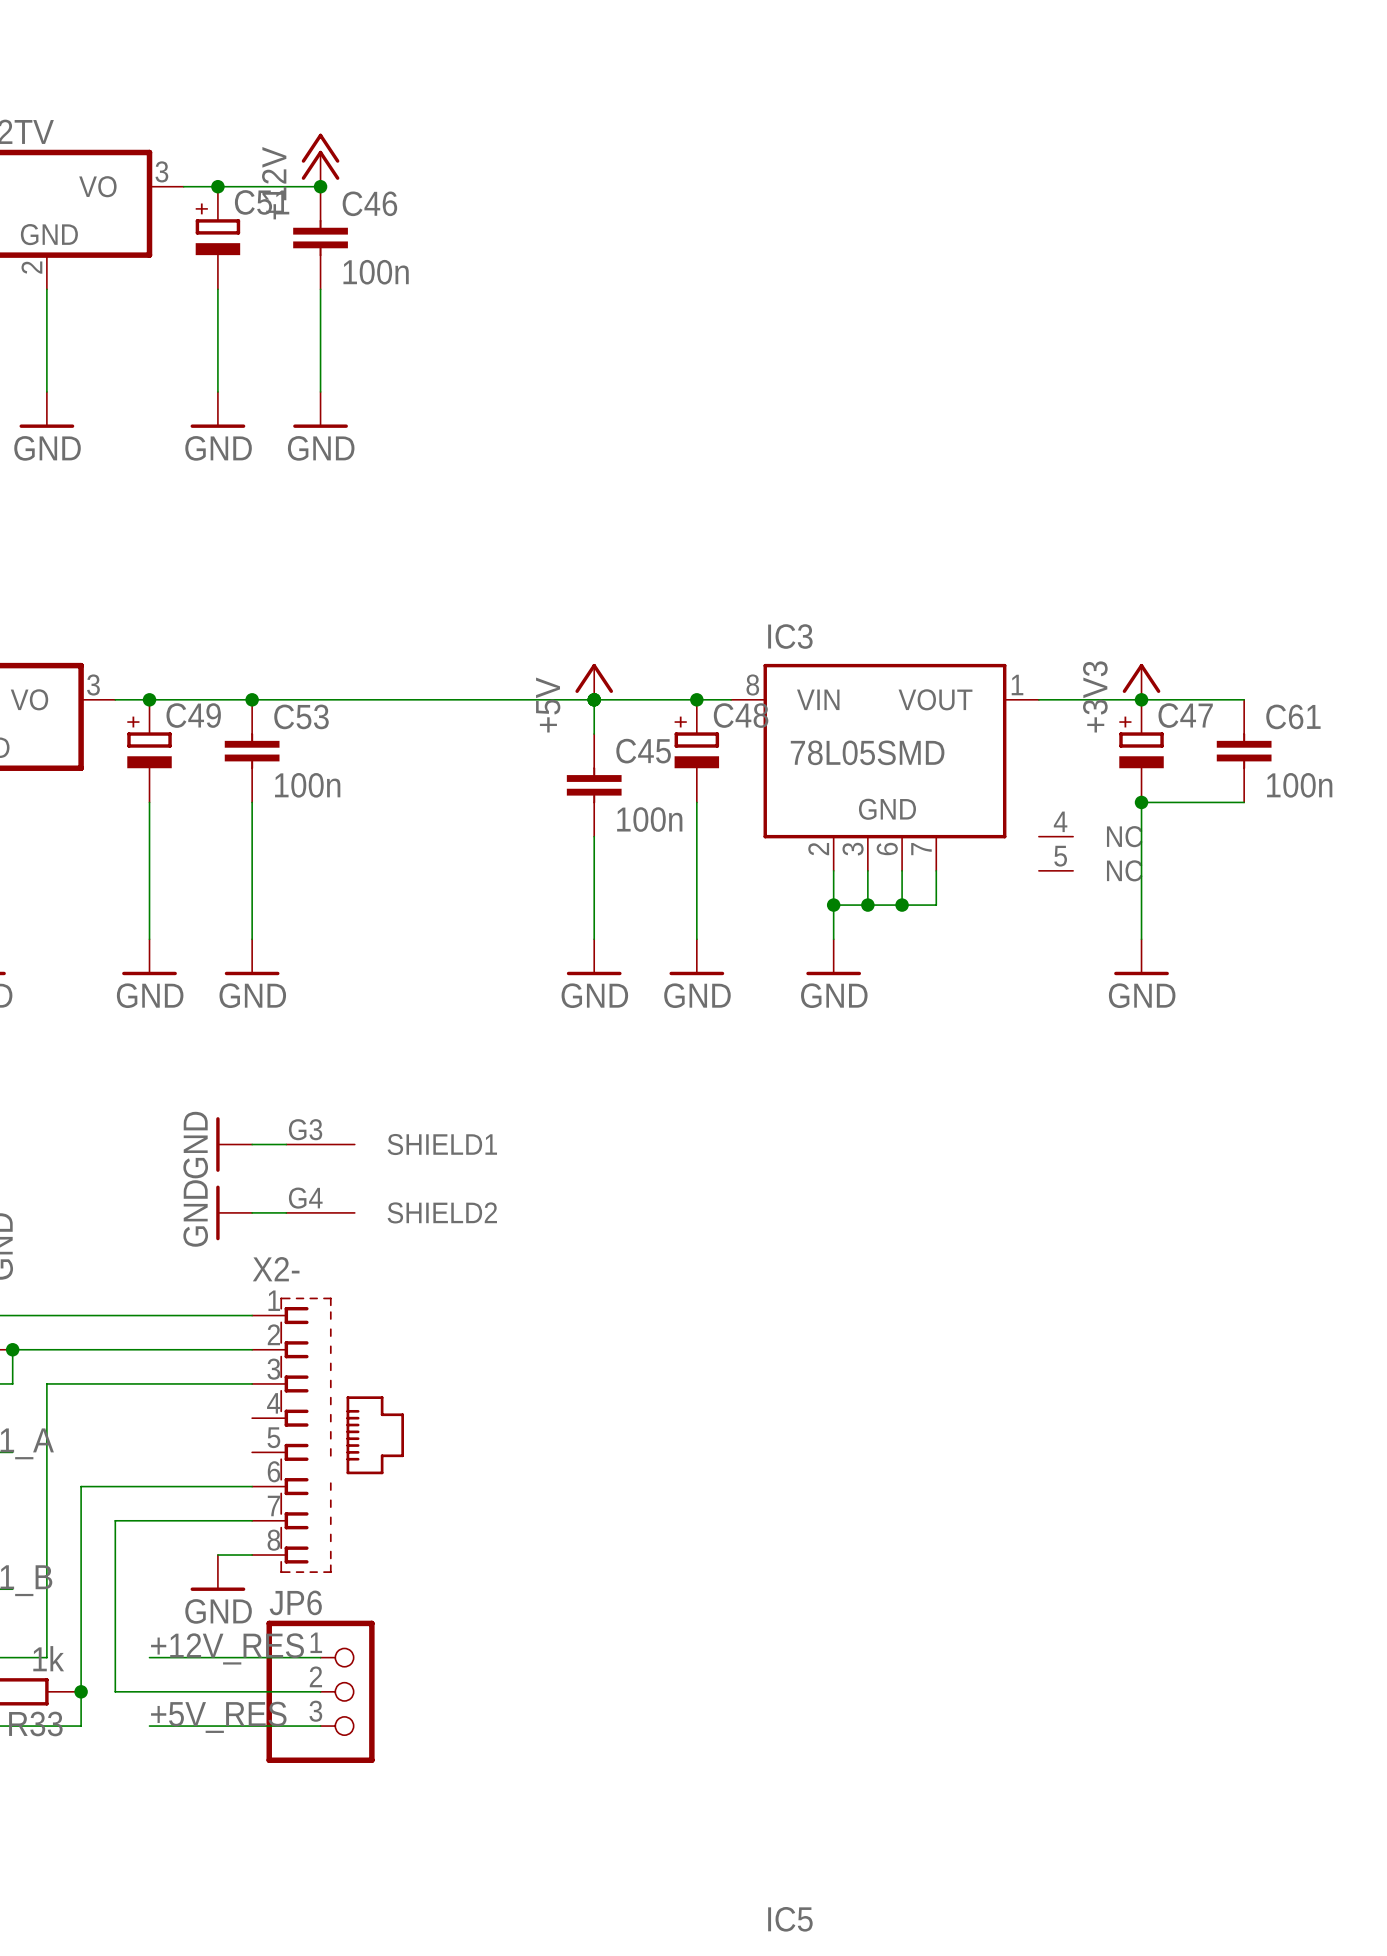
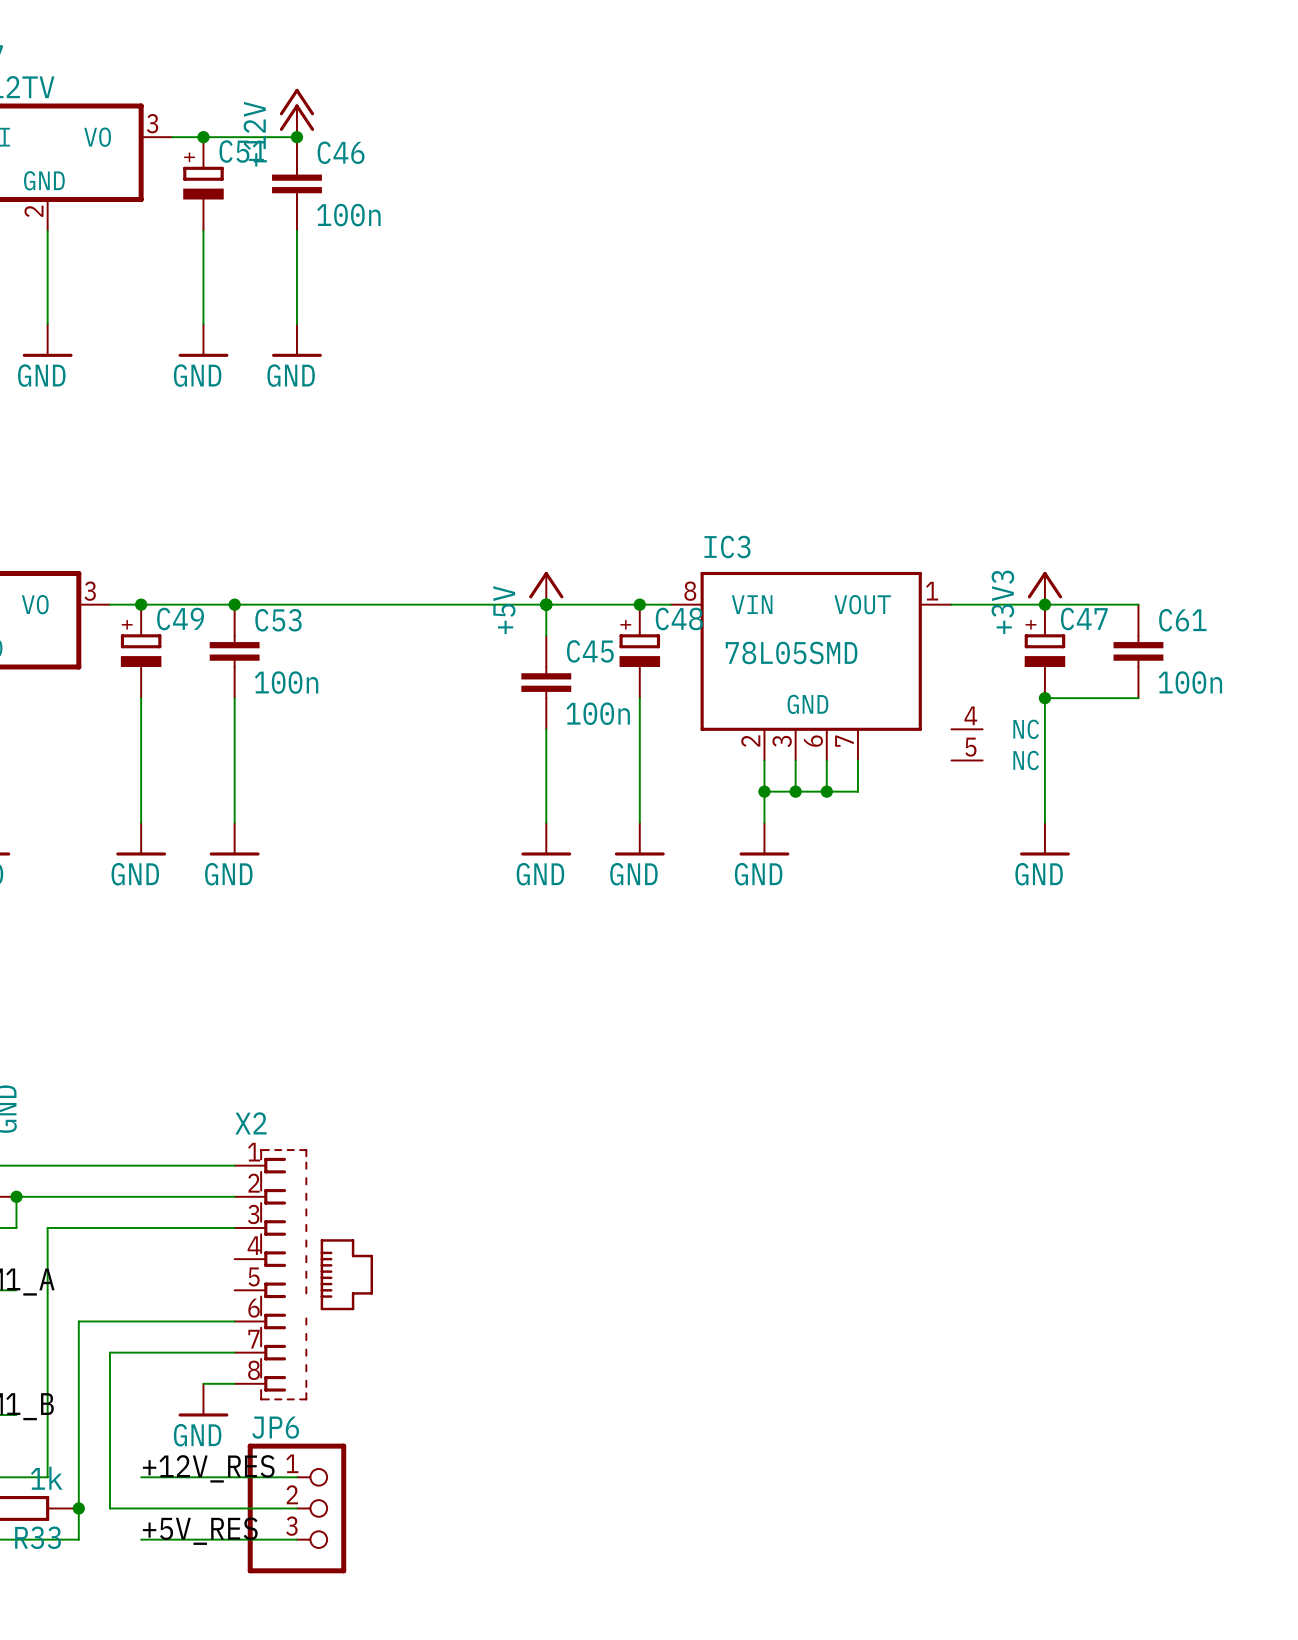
power symbol: GND (234, 1144) -> none
wire: (252, 1144) (286, 1144) -> none
part: (320, 1178) -> none
power symbol: GND (234, 1212) -> none
wire: (252, 1212) (286, 1212) -> none
X2- name: X2- (276, 1269) -> X2 (250, 1123)

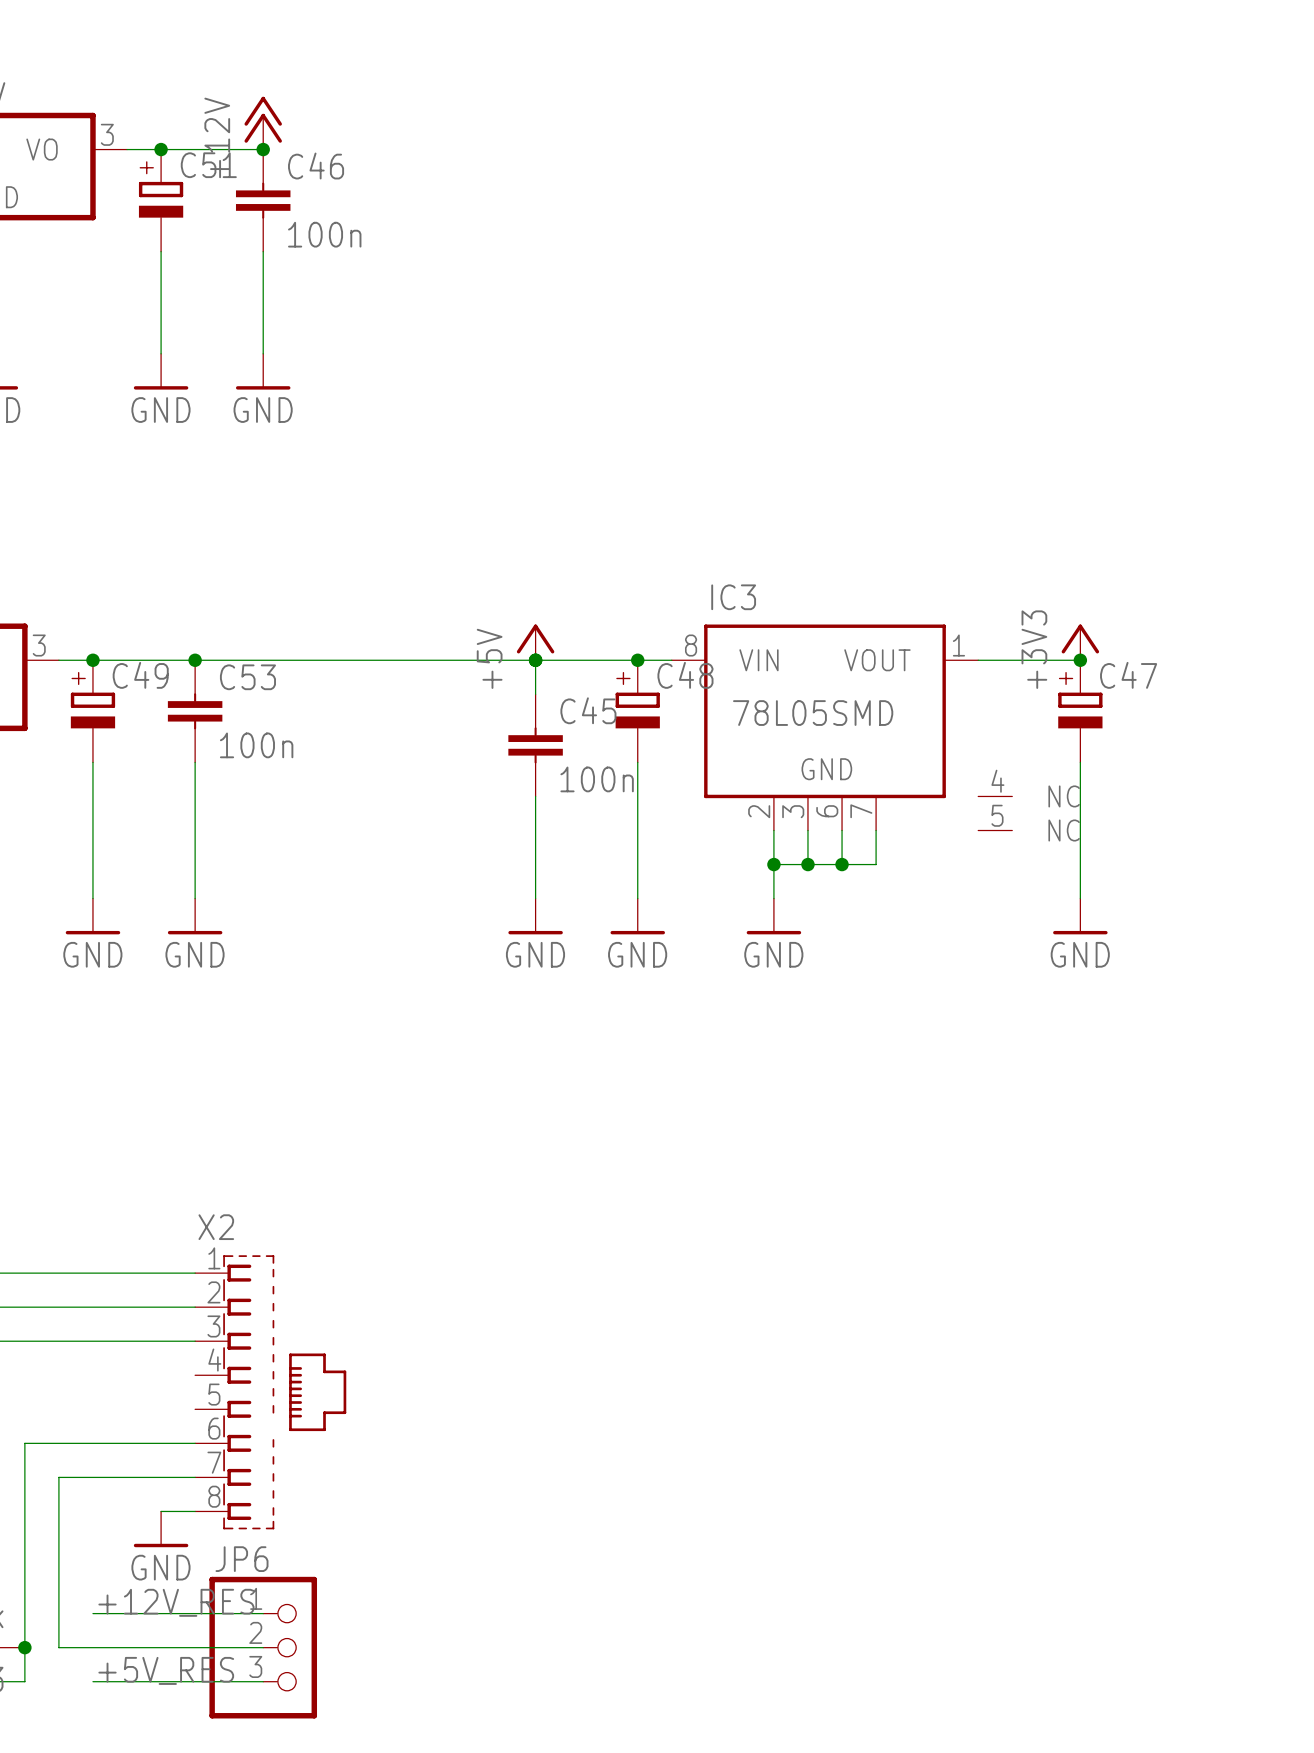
wire: (1044, 604) (1138, 604) -> none
C61: 100n (1138, 651) -> none
wire: (1044, 698) (1138, 698) -> none
junction: (1044, 698) -> none

